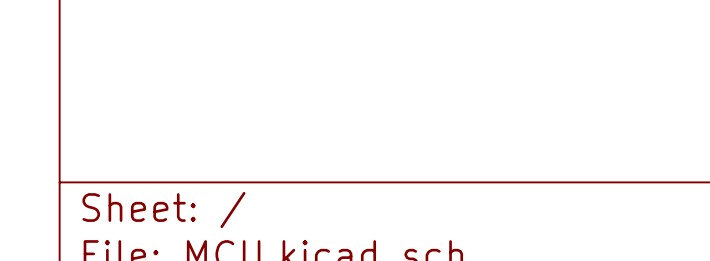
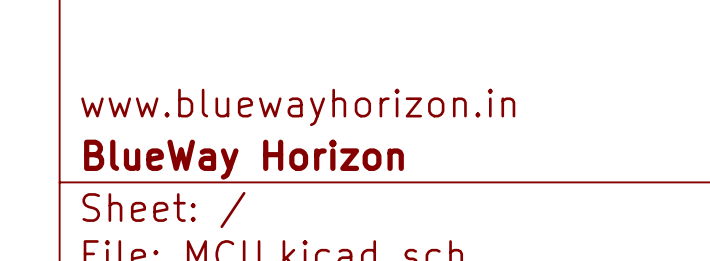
title block: none -> www.bluewayhorizon.in (298, 107)
title block: none -> BlueWay Horizon (243, 159)

